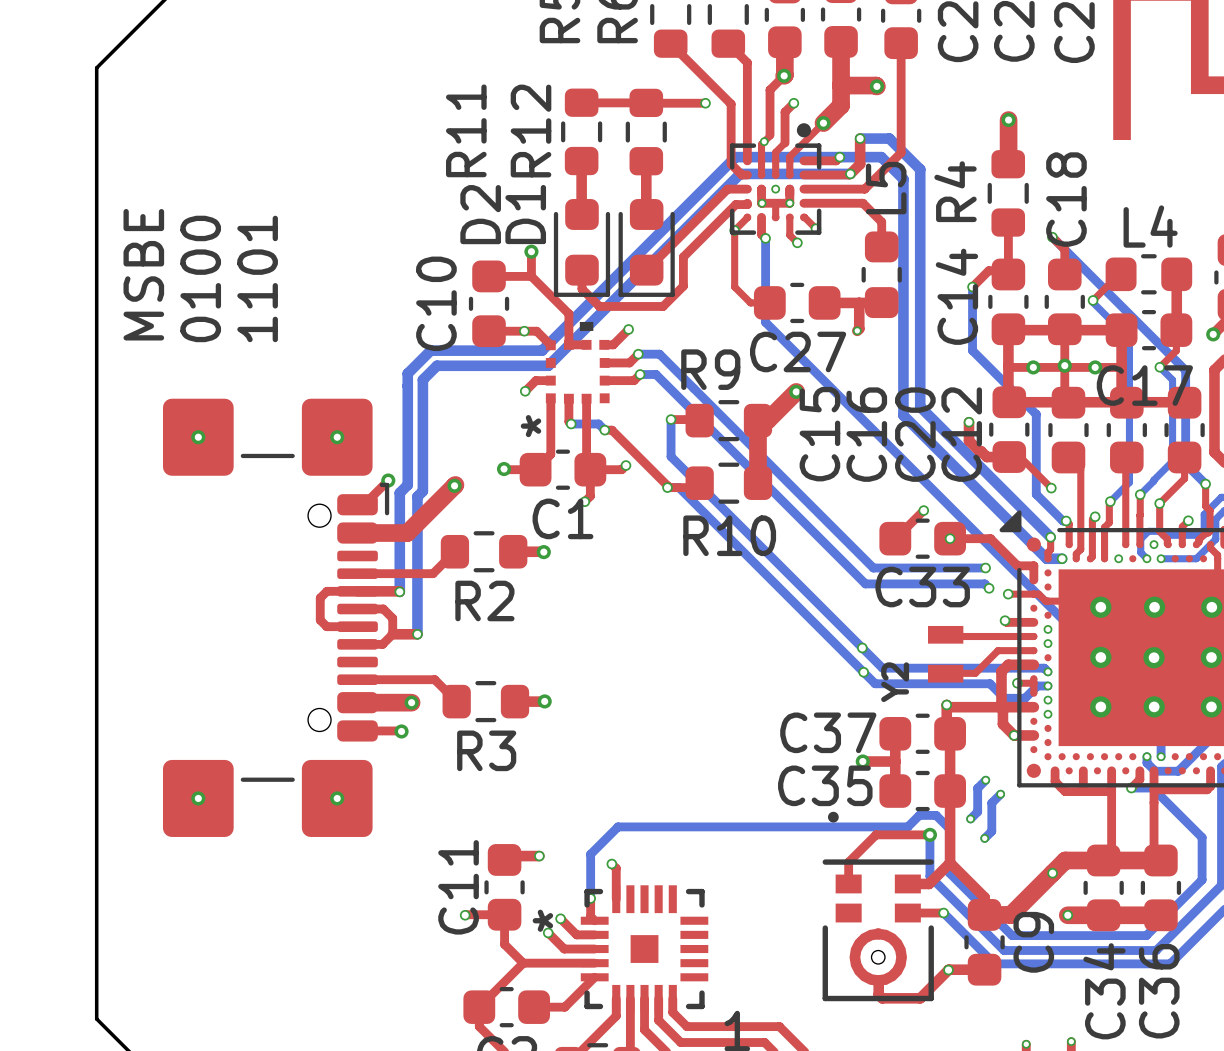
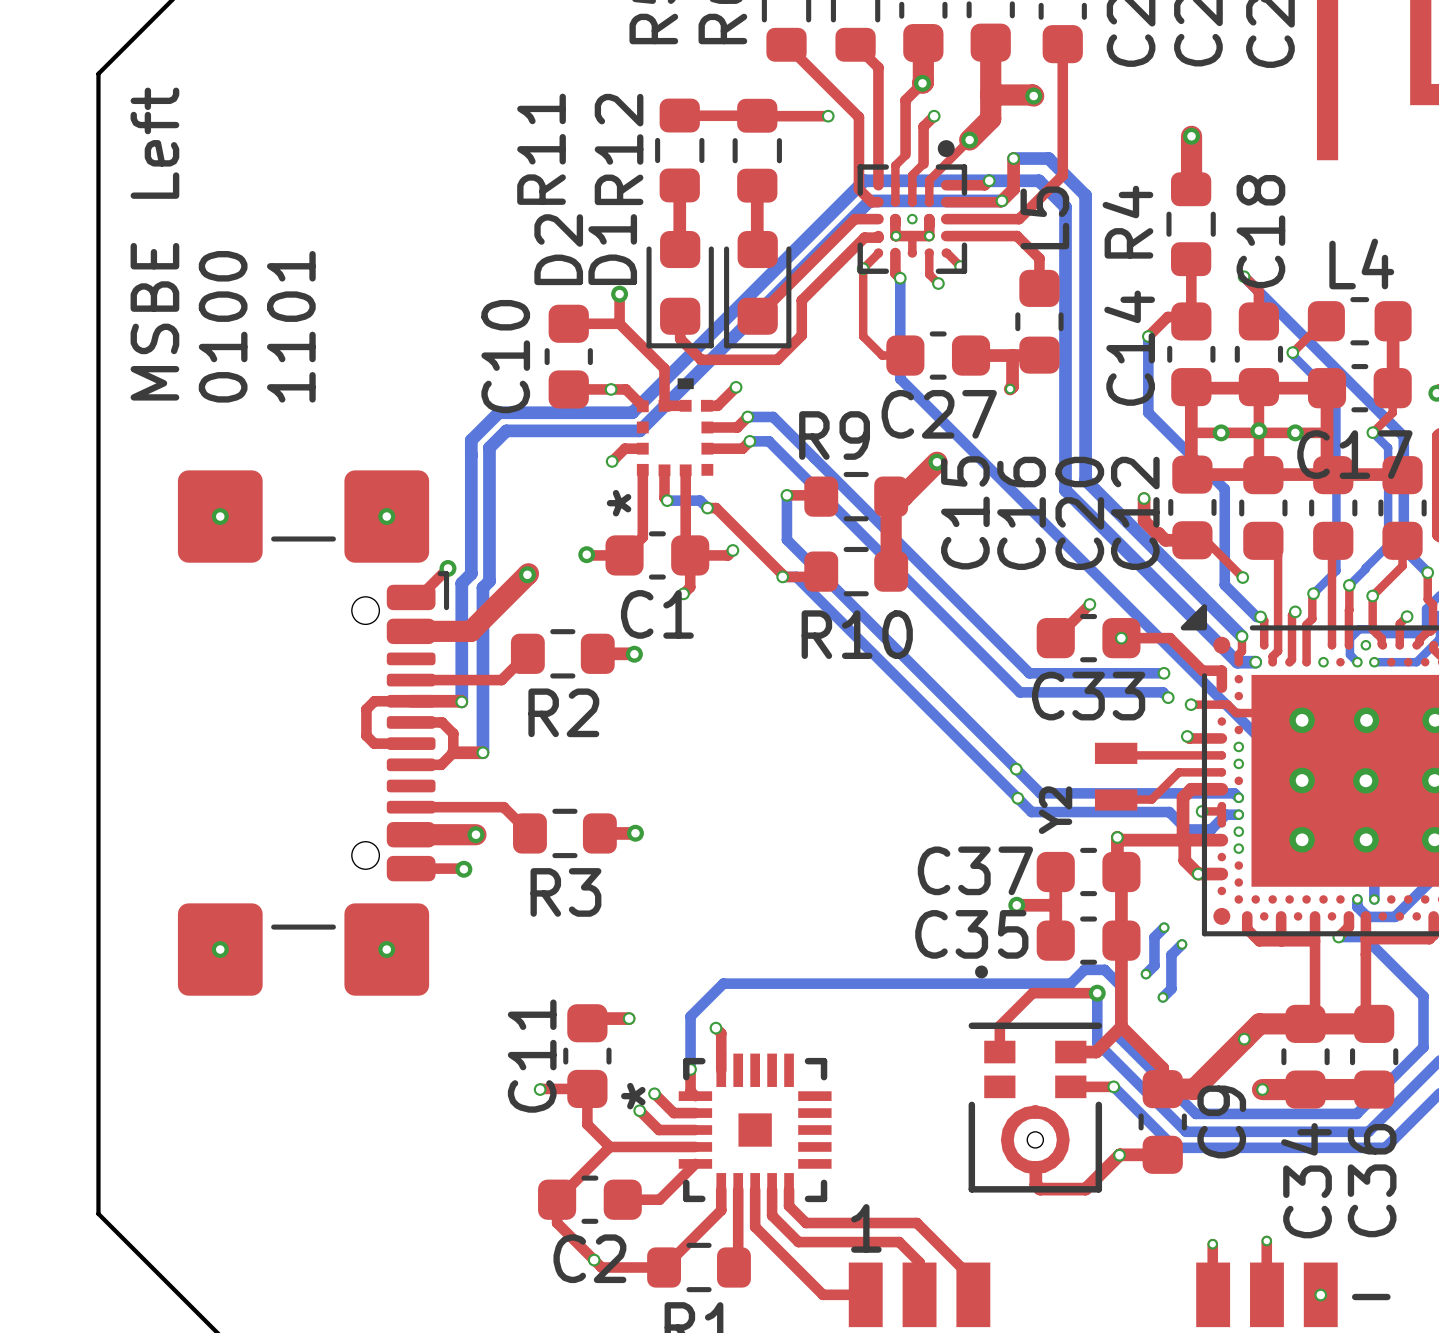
via: (764, 141) -> none
text: MSBE (143, 274) -> MSBE Left (154, 244)

